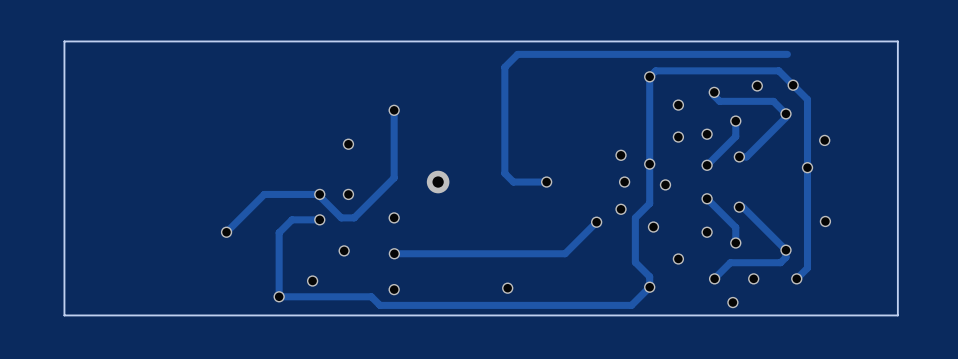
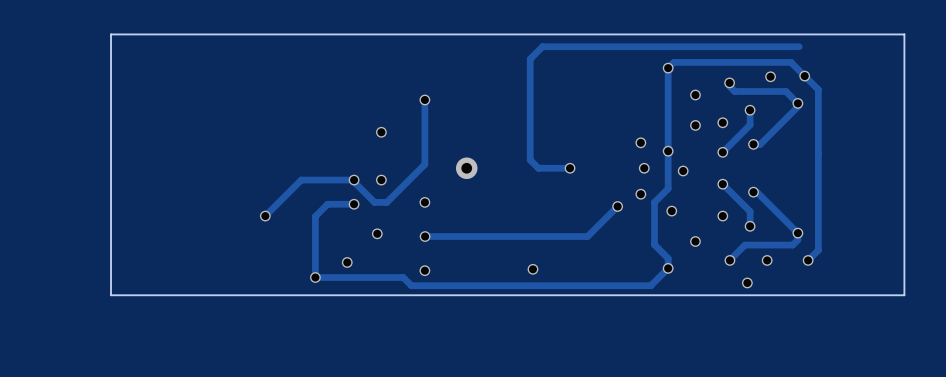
via: (824, 140) -> none
via: (807, 167) -> none
via: (825, 221) -> none

